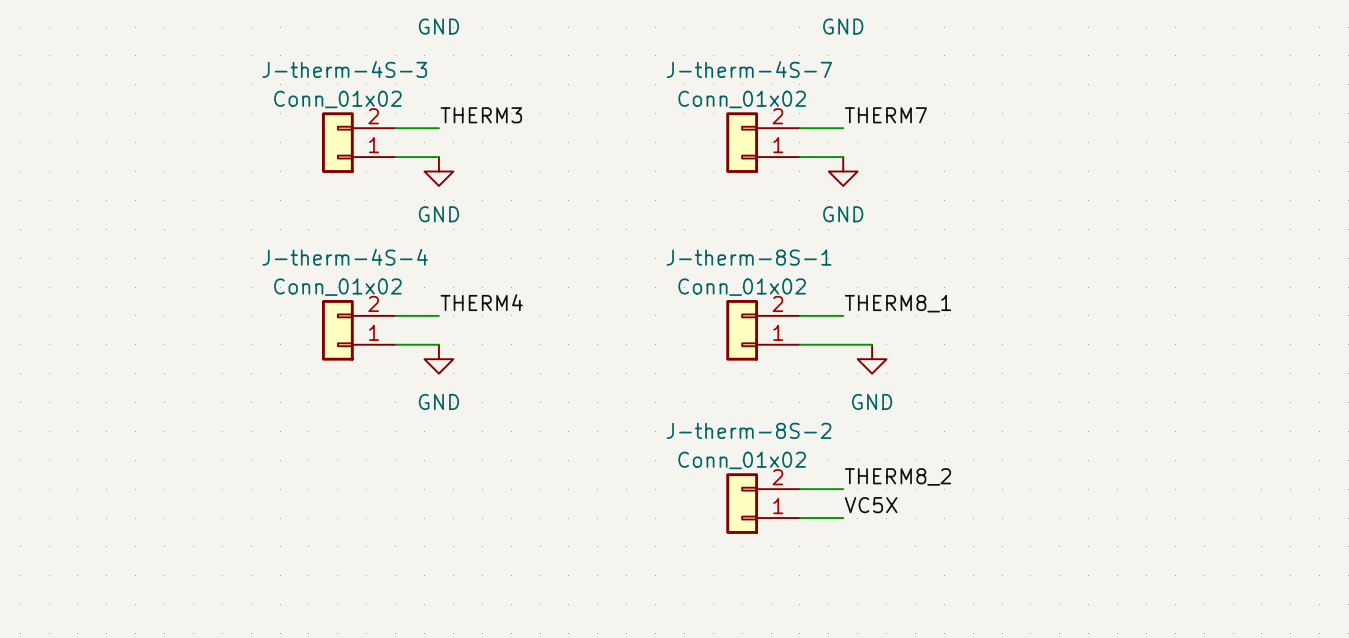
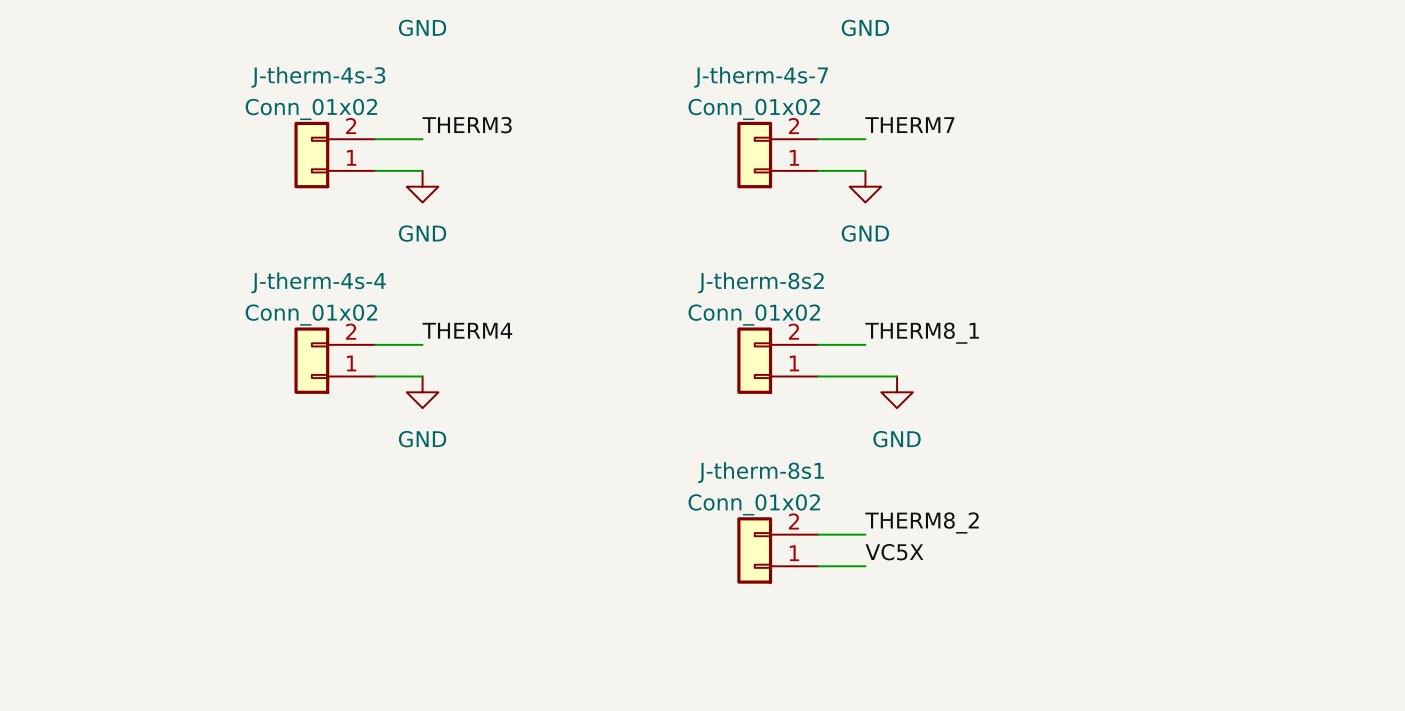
J-therm-4S-3 name: J-therm-4S-3 (344, 69) -> J-therm-4s-3 (318, 77)
J-therm-4S-7 name: J-therm-4S-7 (749, 69) -> J-therm-4s-7 (761, 77)
J-therm-4S-4 name: J-therm-4S-4 (345, 257) -> J-therm-4s-4 (318, 282)
J-therm-8S-1 name: J-therm-8S-1 (749, 257) -> J-therm-8s2 (760, 282)
J-therm-8S-2 name: J-therm-8S-2 (749, 430) -> J-therm-8s1 (761, 472)

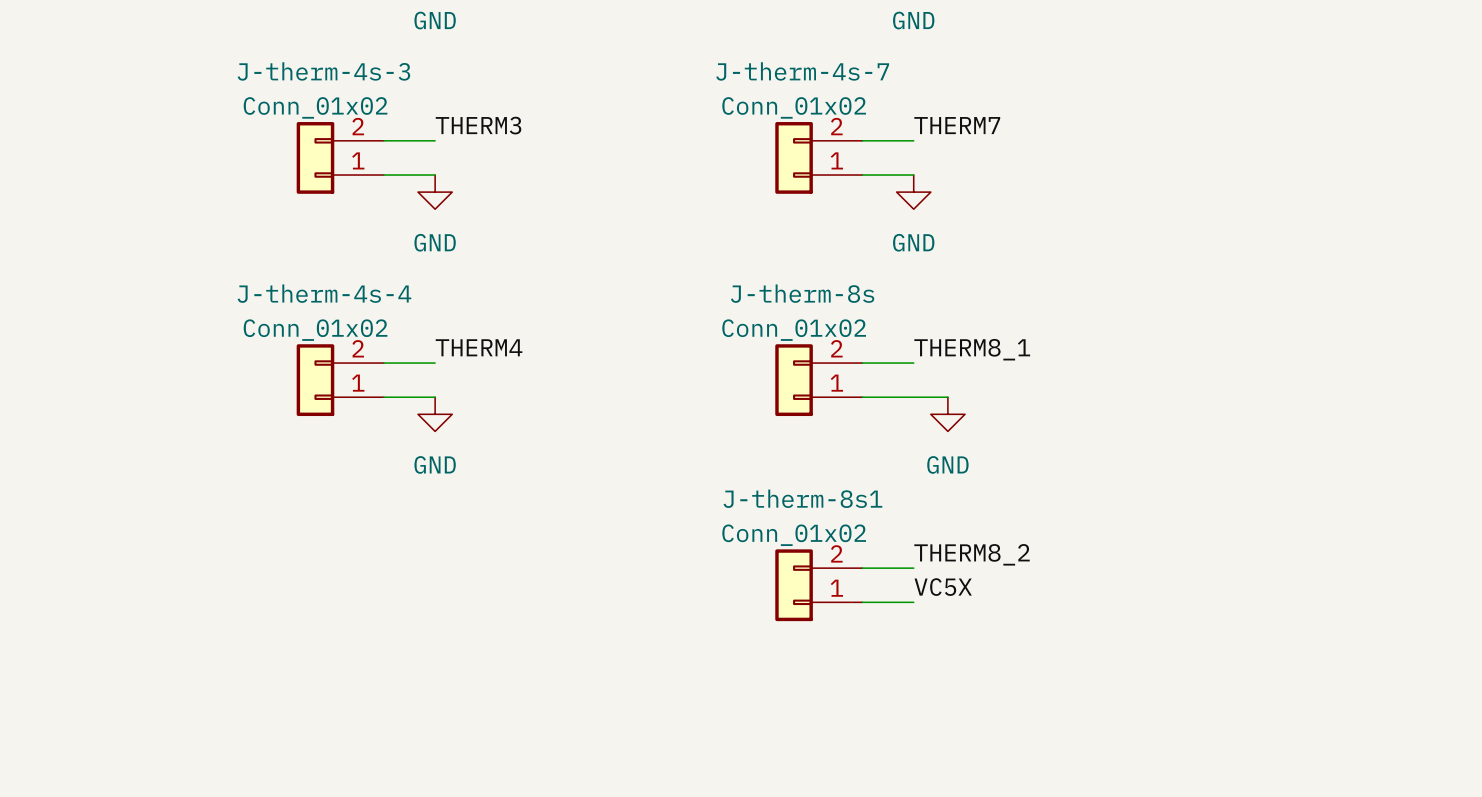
J-therm-8s2 name: J-therm-8s2 (760, 282) -> J-therm-8s (802, 293)

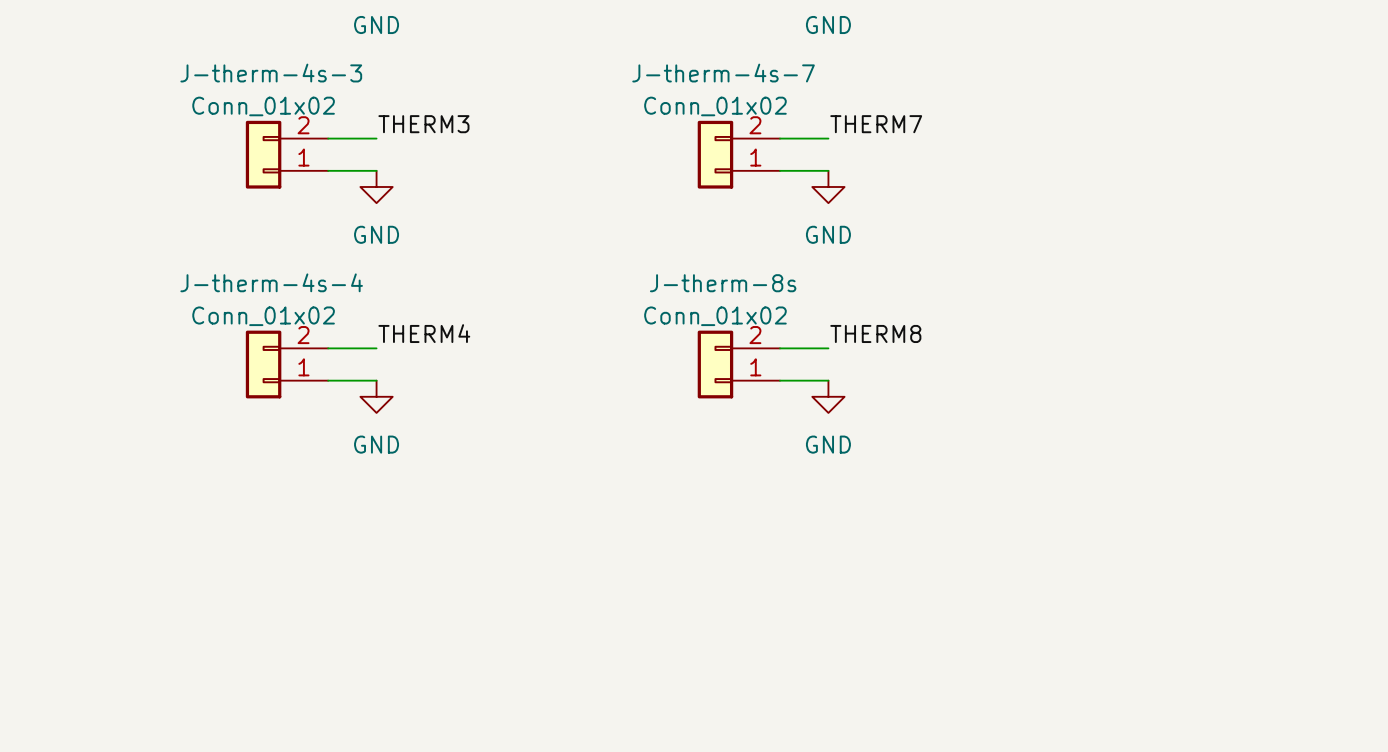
label: THERM8_1 (972, 349) -> THERM8 (875, 333)
wire: (913, 397) (947, 397) -> none
power symbol position: GND (947, 414) -> GND (828, 396)
label: THERM8_2 (972, 554) -> none
wire: (862, 568) (913, 568) -> none
J-therm-8s1: Conn_01x02 (818, 585) -> none
label: VC5X (943, 587) -> none
wire: (862, 602) (913, 602) -> none

